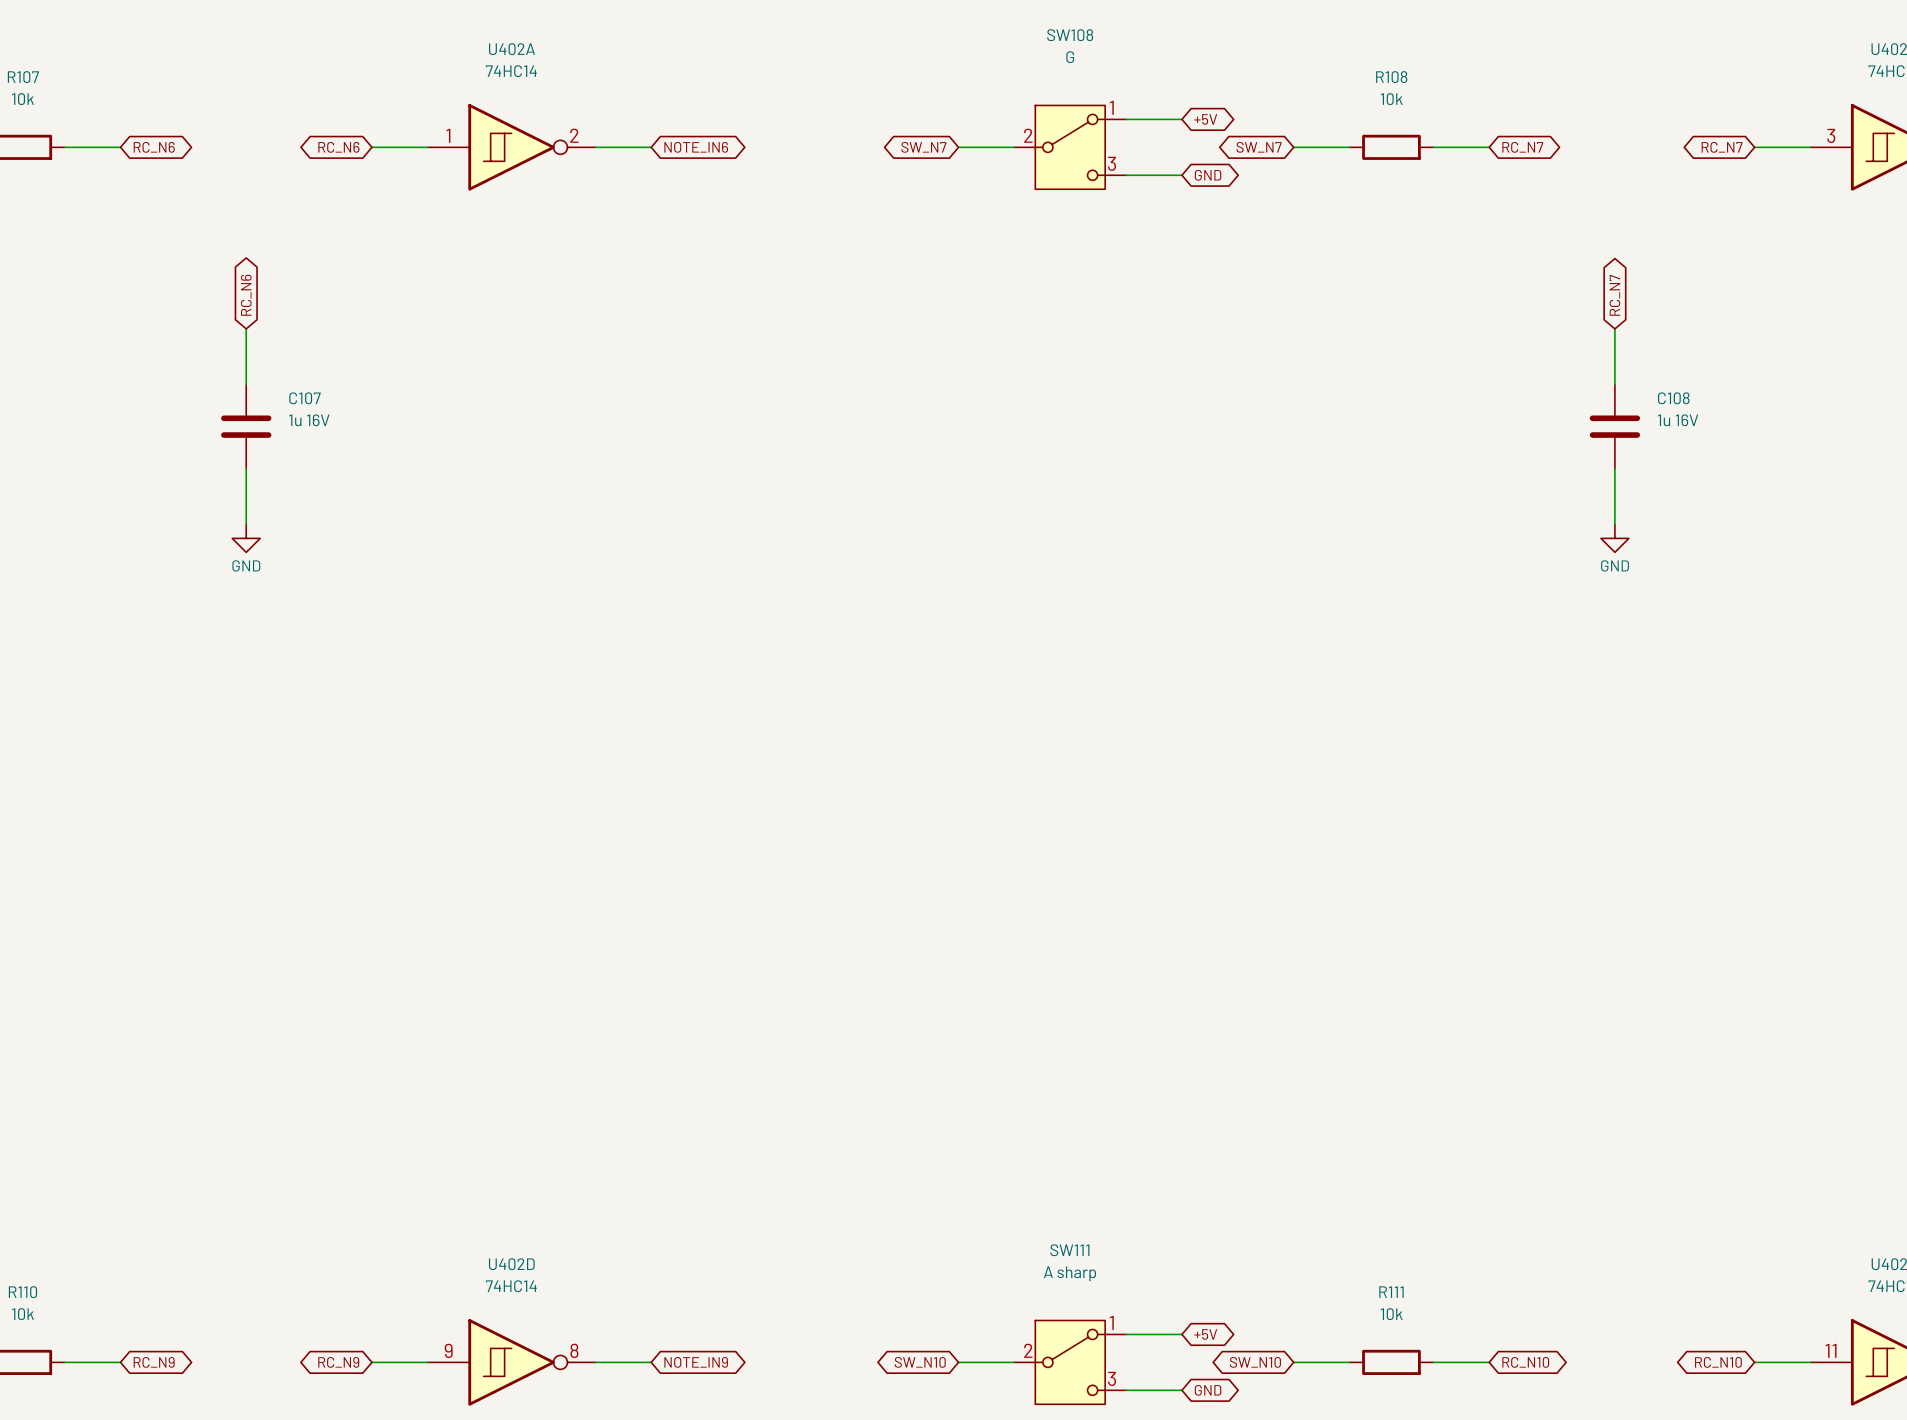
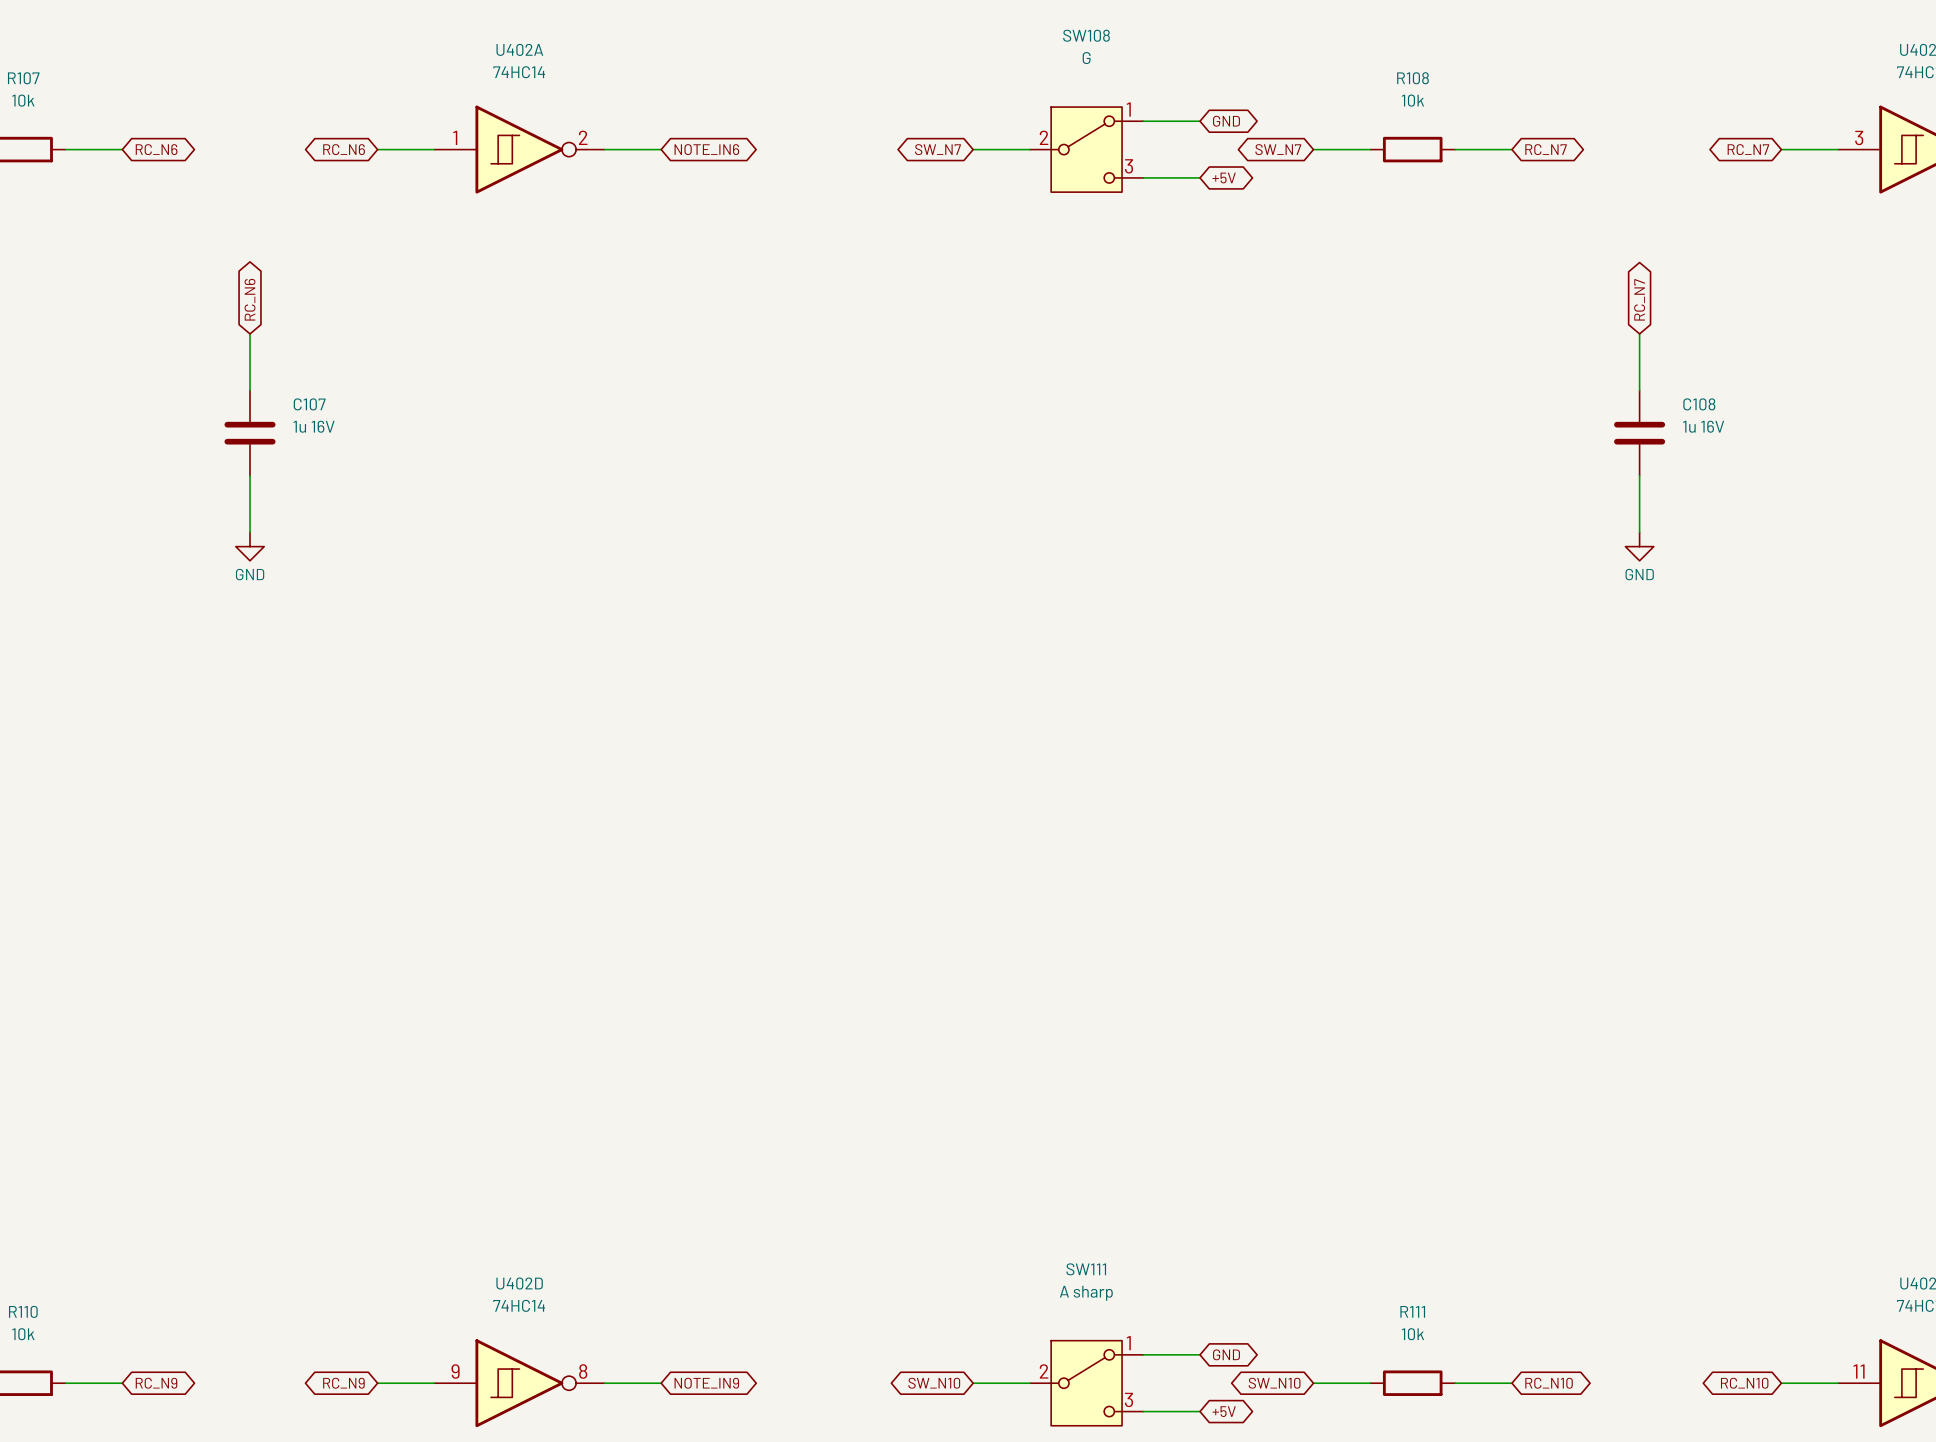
global label: +5V (1205, 119) -> GND (1226, 121)
global label: GND (1208, 175) -> +5V (1224, 178)
global label: +5V (1205, 1334) -> GND (1226, 1354)
global label: GND (1208, 1390) -> +5V (1224, 1411)

